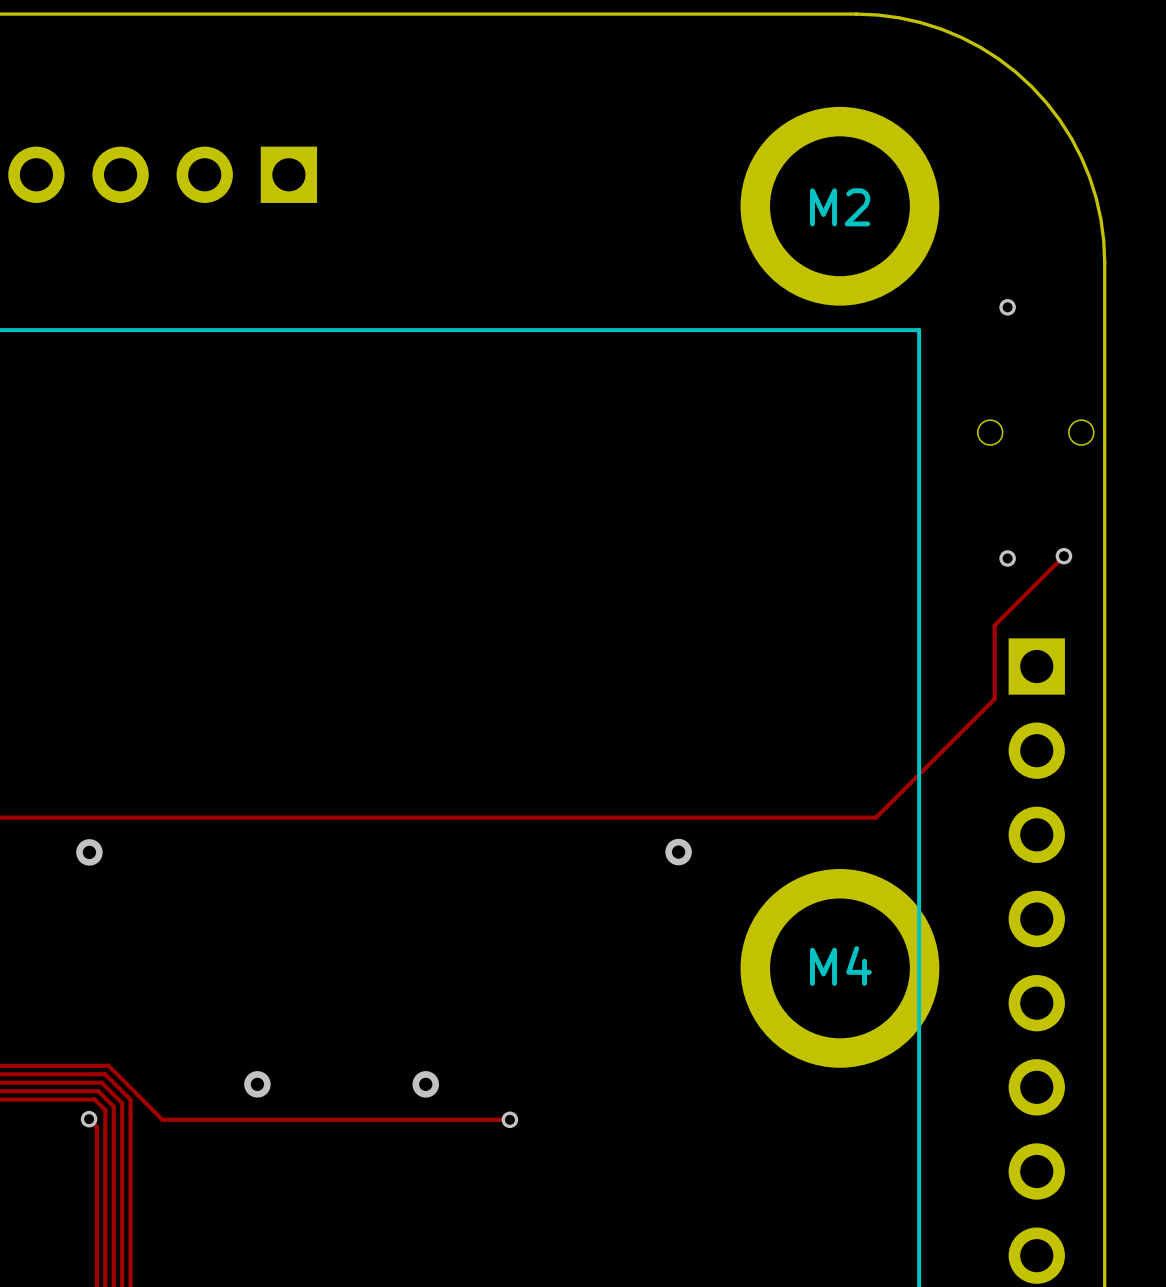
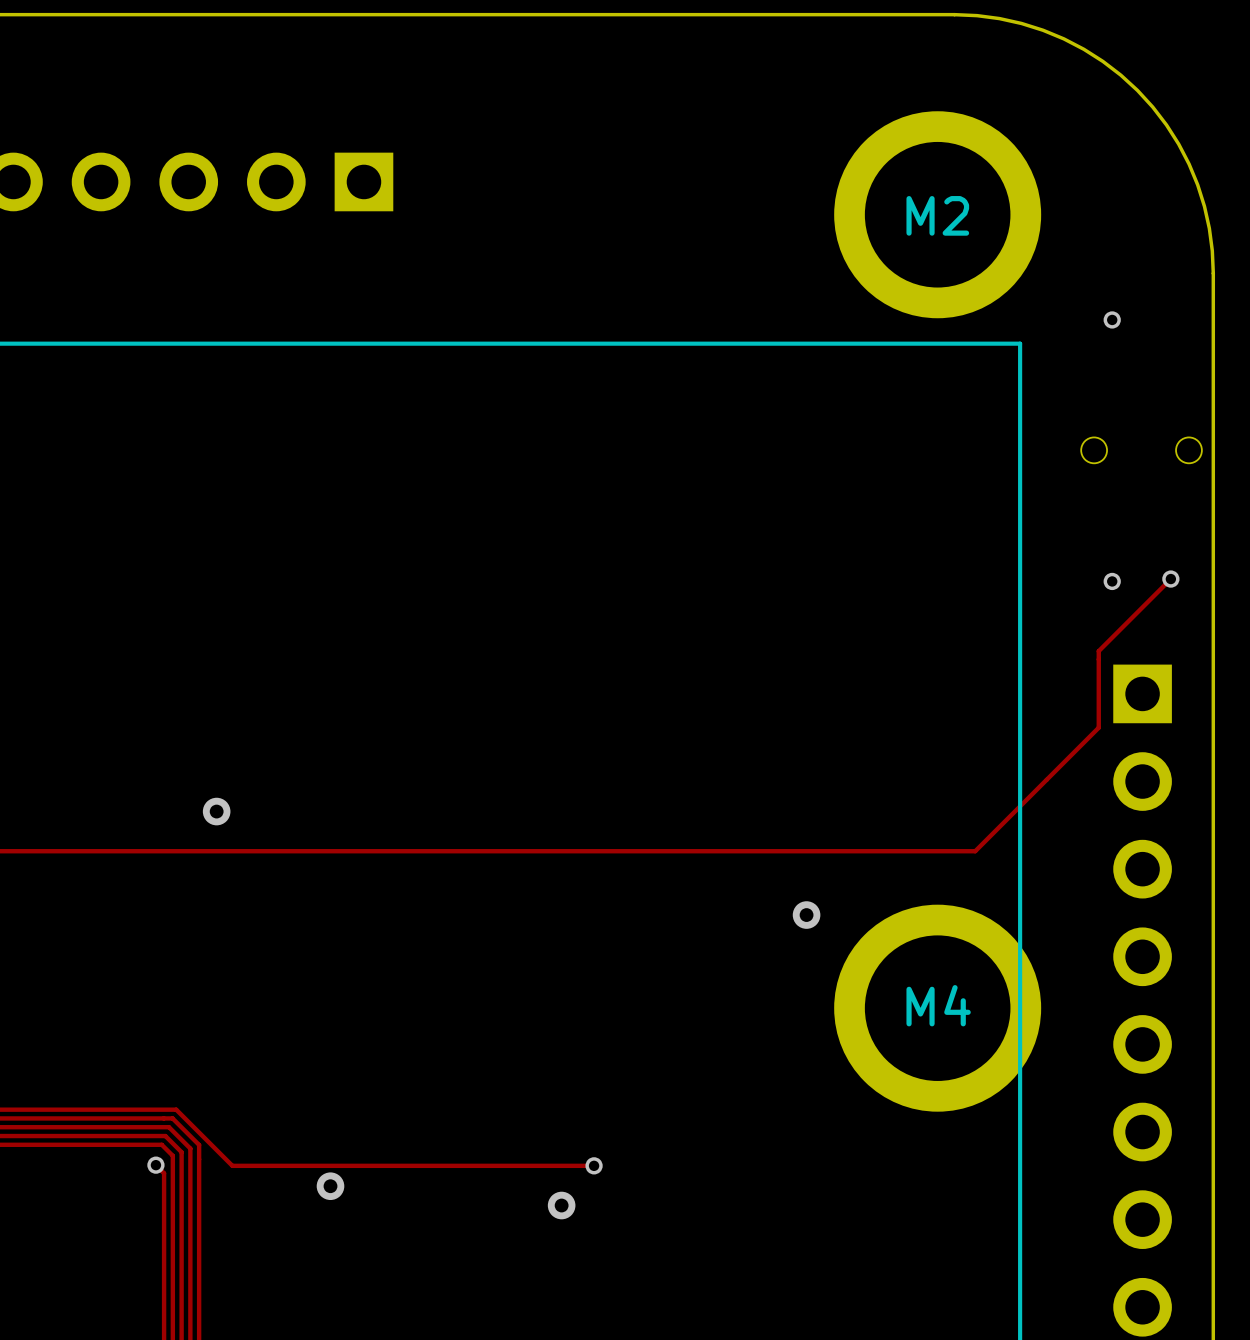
via position: (89, 852) -> (216, 811)
via position: (678, 852) -> (806, 915)
via position: (257, 1084) -> (330, 1186)
via: (425, 1084) -> none
via: none -> (561, 1205)

